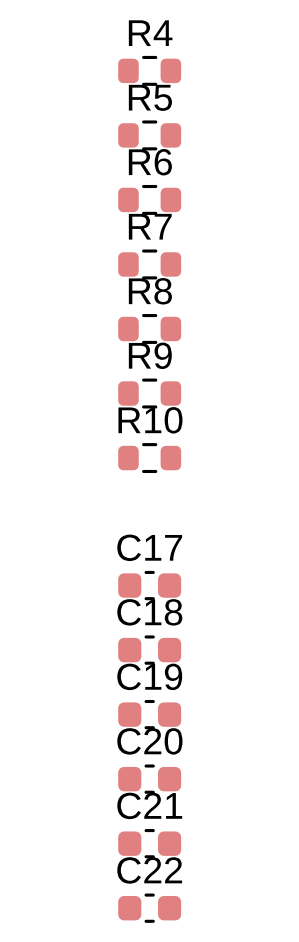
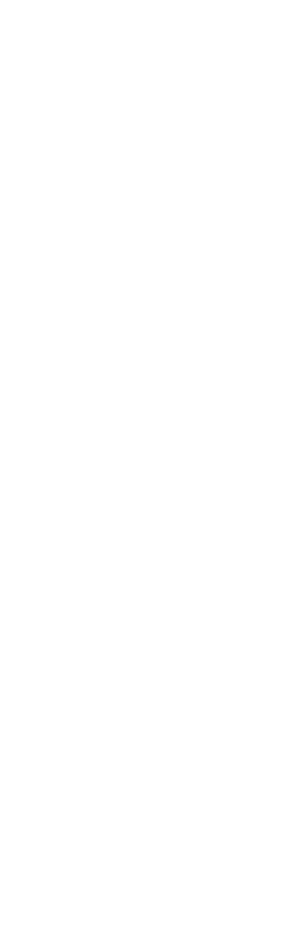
R4: (149, 70) -> none
R5: (149, 135) -> none
R6: (149, 199) -> none
R7: (149, 264) -> none
R8: (149, 328) -> none
R9: (149, 393) -> none
R10: (149, 458) -> none
C17: (149, 585) -> none
C18: (149, 650) -> none
C19: (149, 714) -> none
C20: (149, 779) -> none
C21: (149, 843) -> none
C22: (149, 908) -> none

